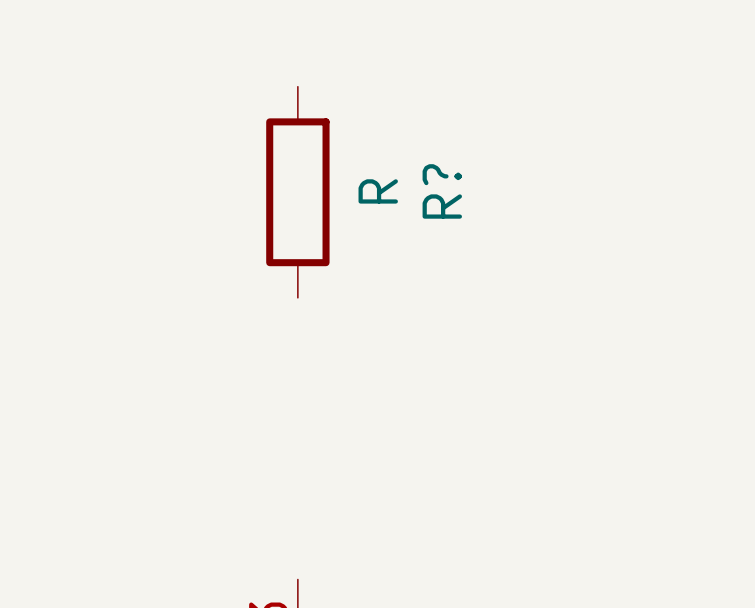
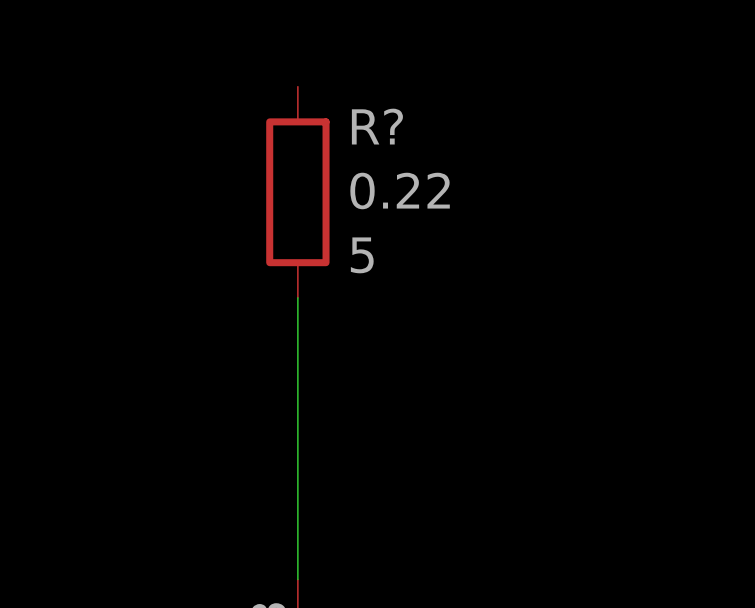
R? value: R (378, 191) -> 0.22 (400, 190)
R? name rotation: 0° (442, 191) -> 90° clockwise (377, 126)
R? text: none -> 5 (362, 255)
wire: none -> (297, 297) (297, 579)

